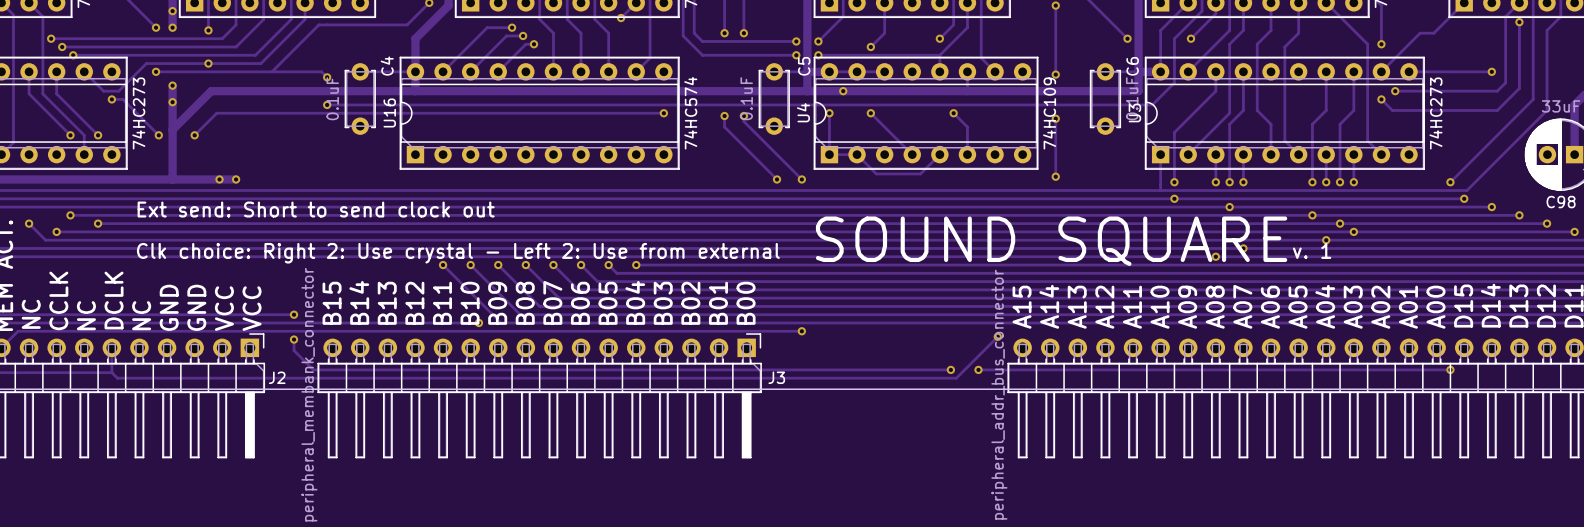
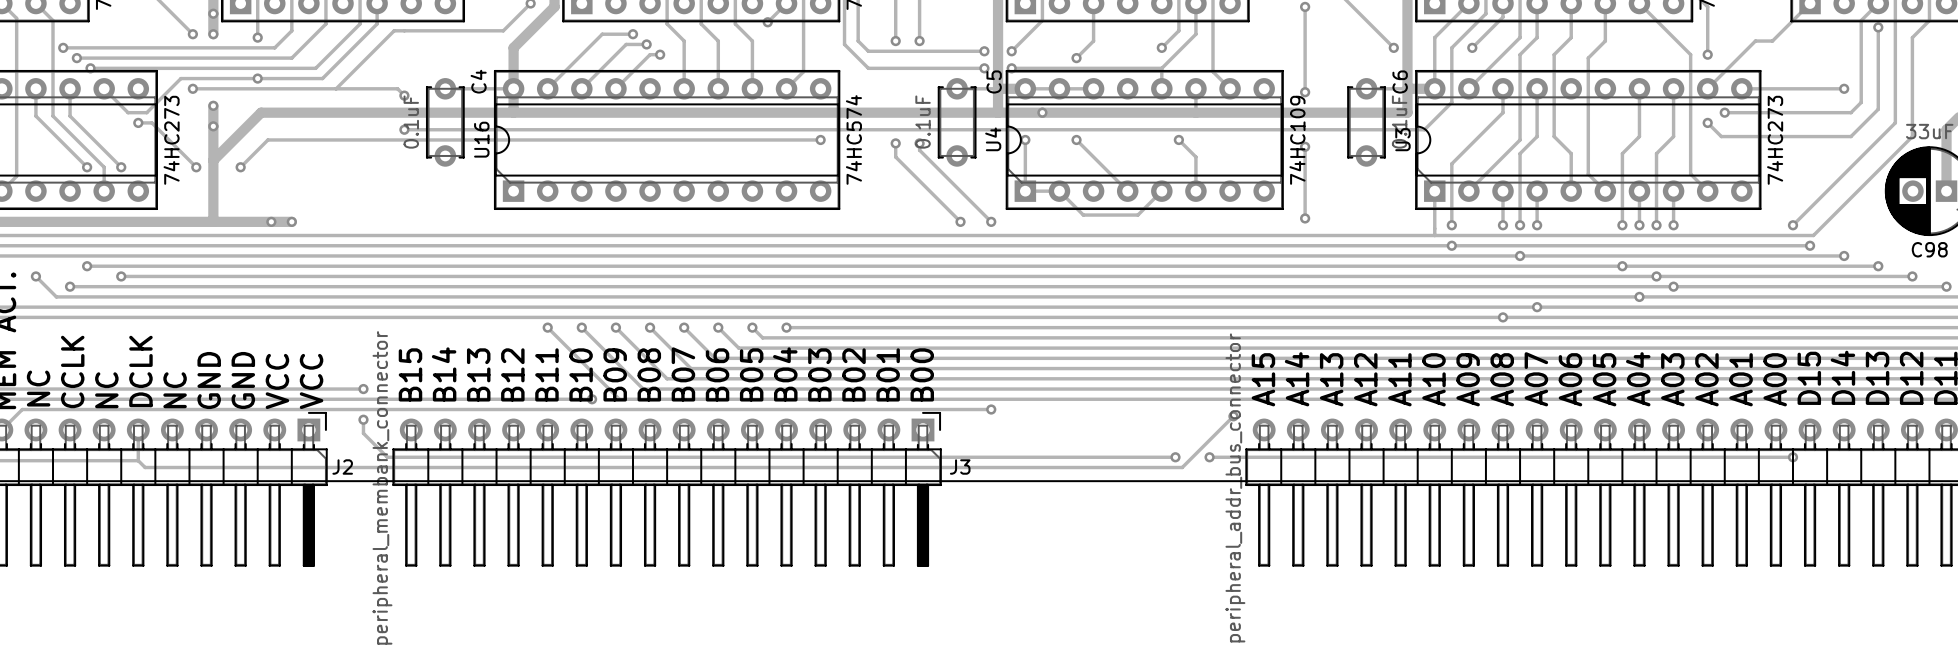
text: Ext send: Short to send clock out (316, 209) -> none
text: SOUND SQUARE (1051, 241) -> none
text: v. 1 (1312, 250) -> none
text: Clk choice: Right 2: Use crystal - Left 2: Use from external (458, 253) -> none

